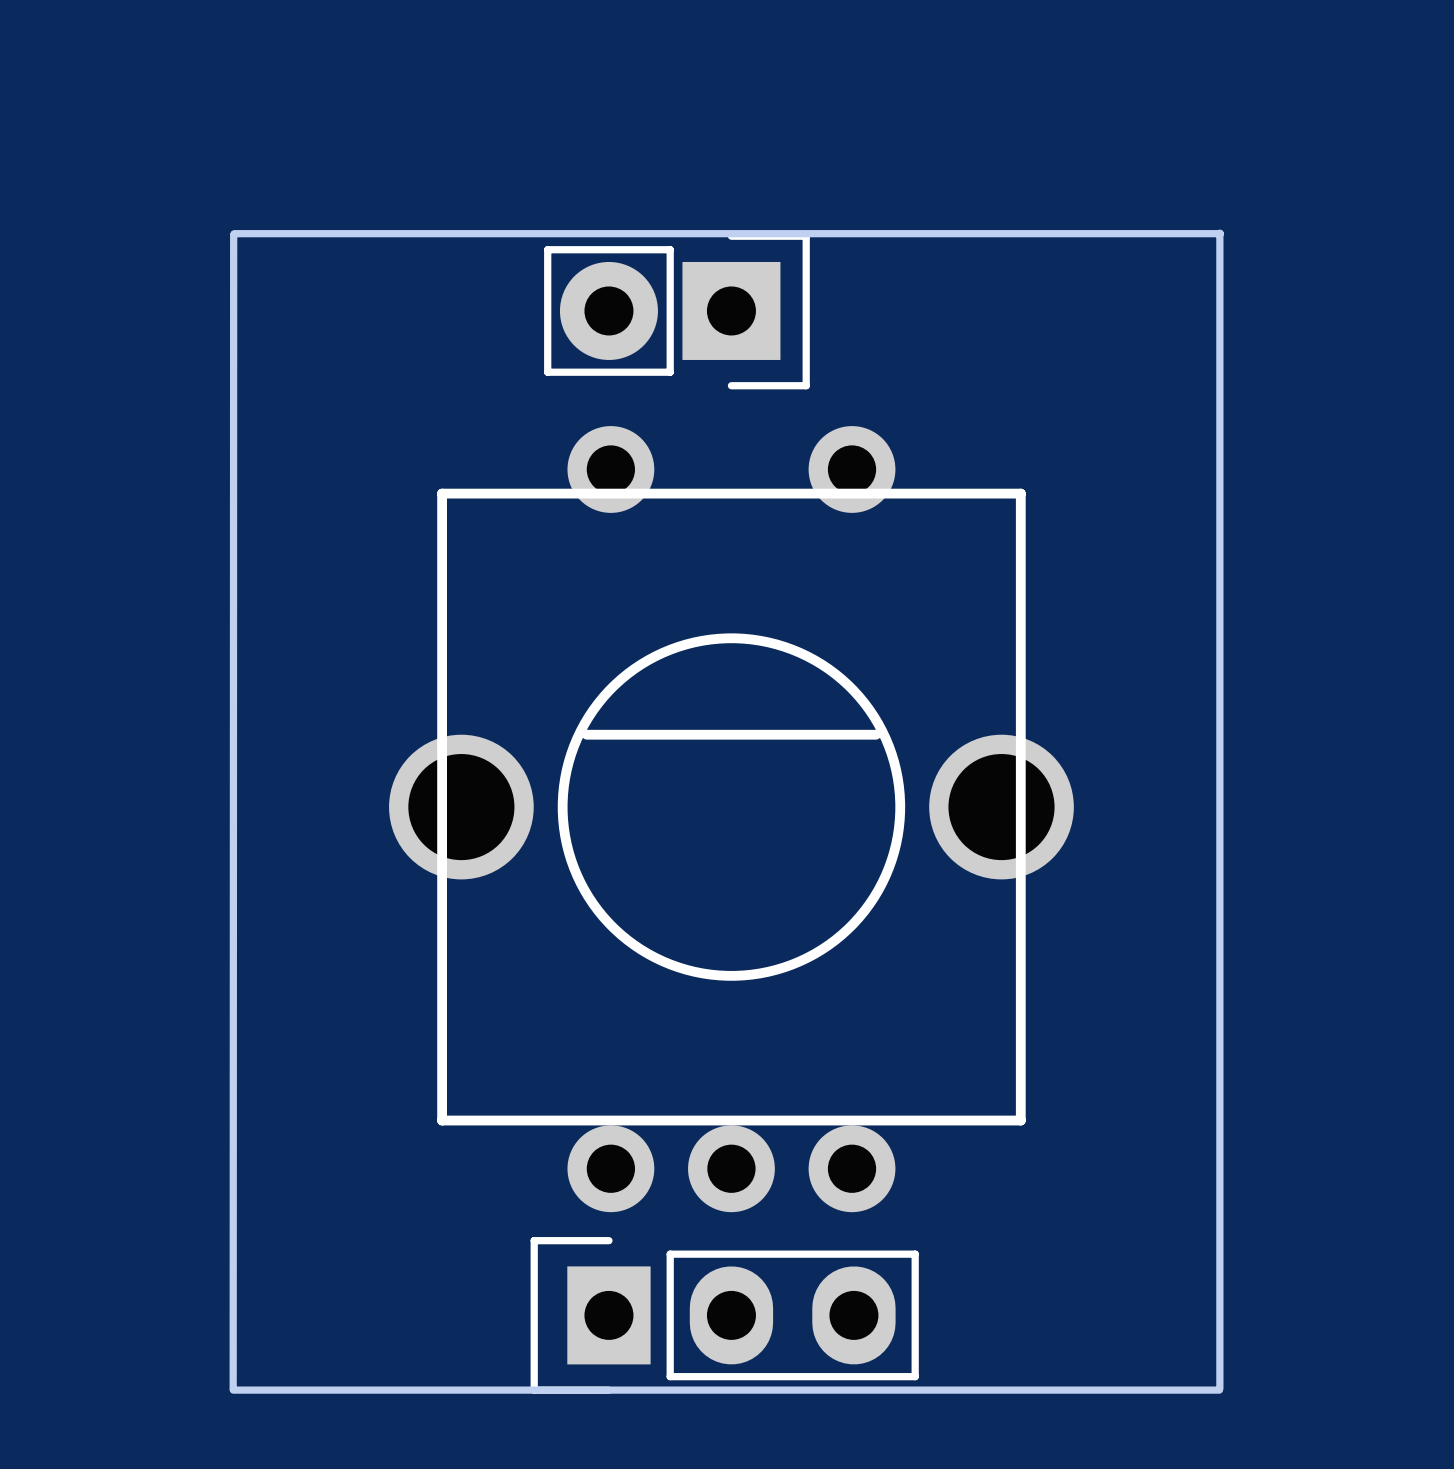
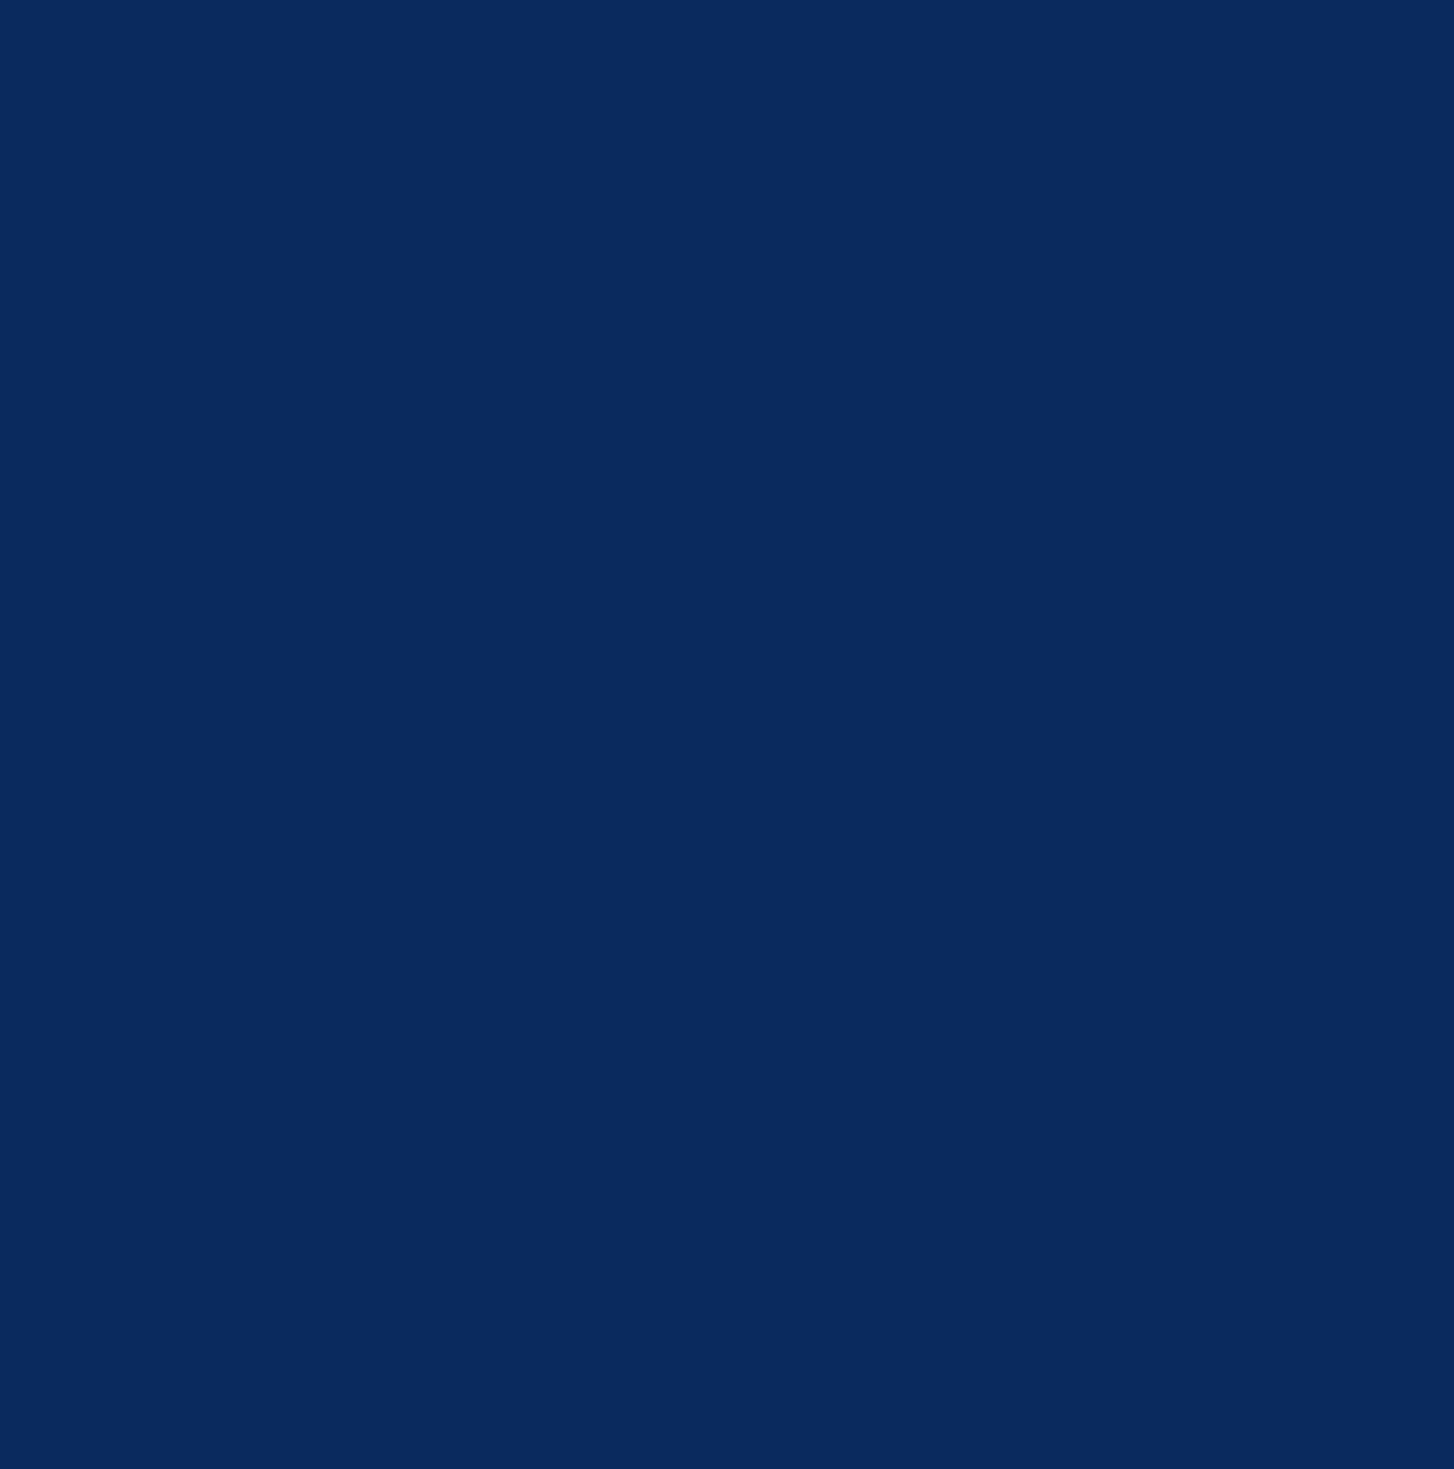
board edge: (234, 233) (1220, 233) -> none
board edge: (1219, 233) (1219, 1388) -> none
board edge: (233, 234) (233, 1389) -> none
part: (676, 310) -> none
part: (731, 819) -> none
part: (724, 1315) -> none
board edge: (233, 1390) (1219, 1390) -> none

